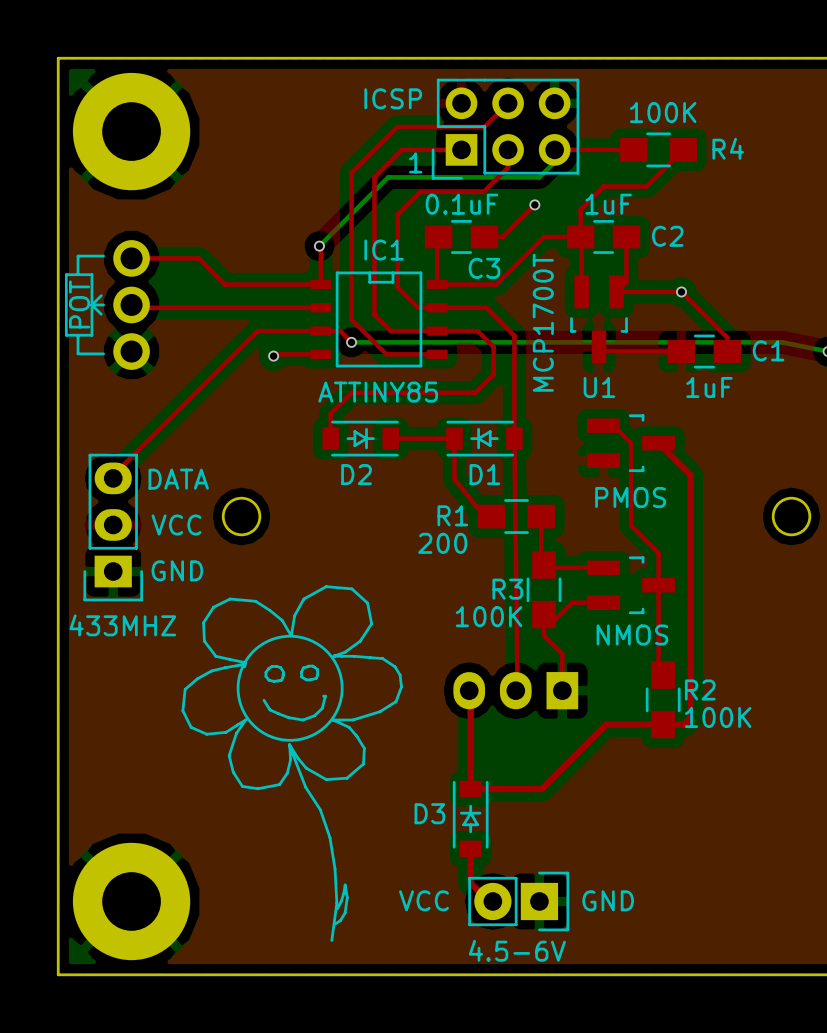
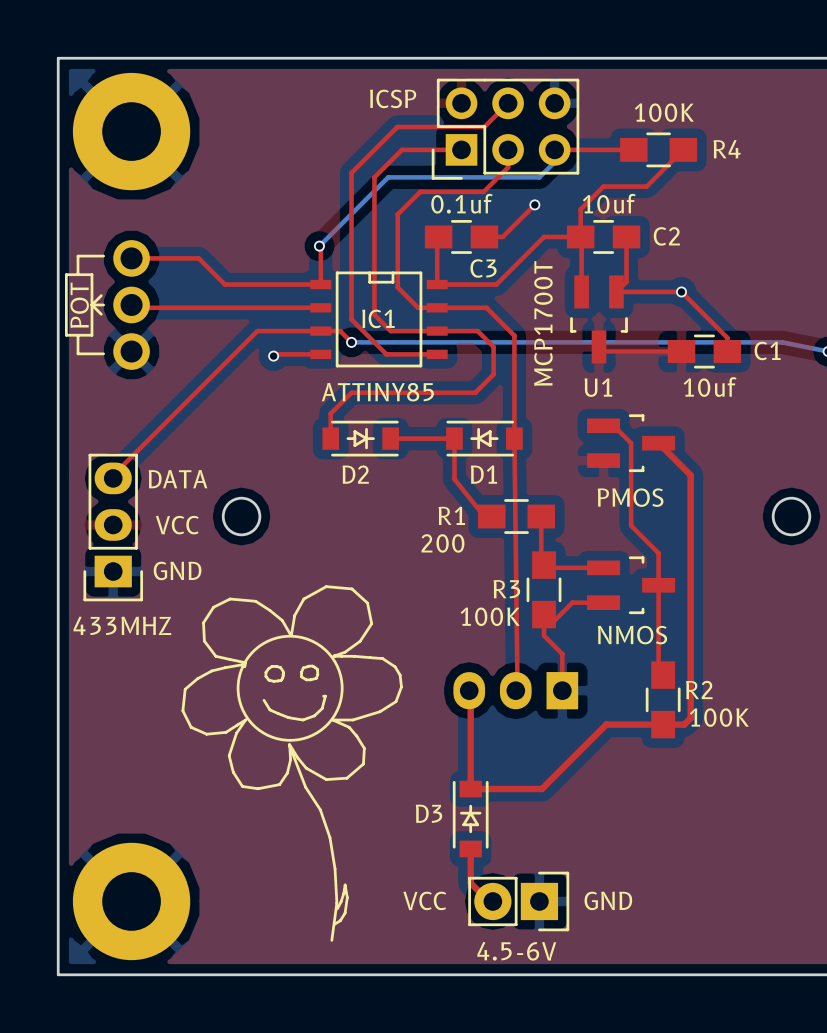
text: 1 (415, 162) -> none
C3 value: 0.1uF (461, 204) -> 0.1uf (461, 203)
C2 value: 1uF (608, 204) -> 10uf (609, 203)
IC1 name position: IC1 (384, 250) -> IC1 (378, 318)
C1 value: 1uF (709, 387) -> 10uf (710, 387)

